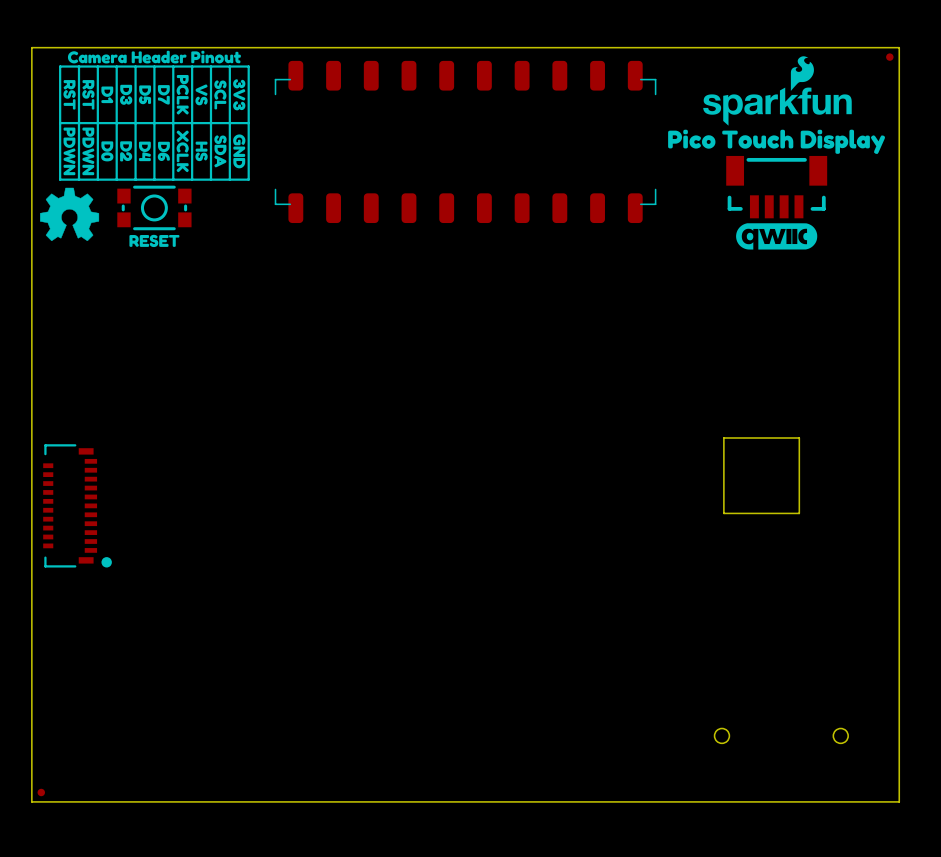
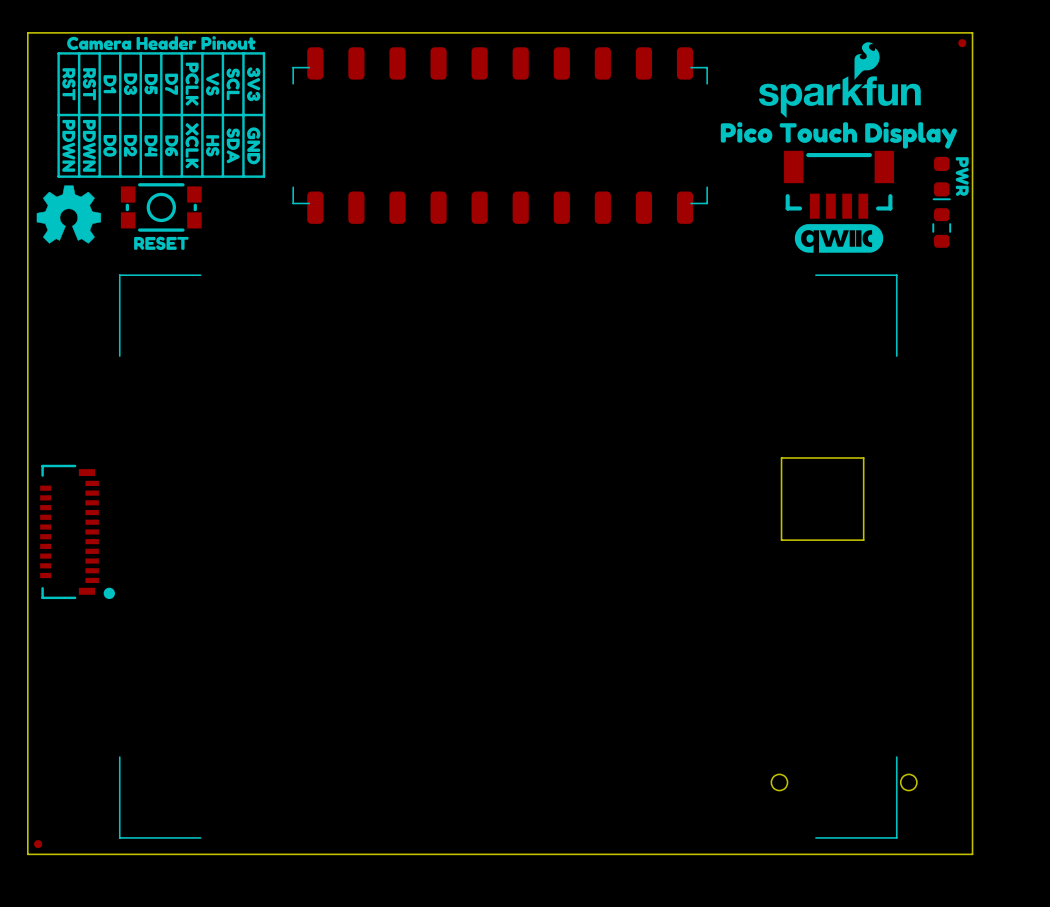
drawing: none -> [955, 157, 969, 197]
part: none -> (941, 178)
part: none -> (941, 227)
drawing: none -> [118, 274, 898, 839]

